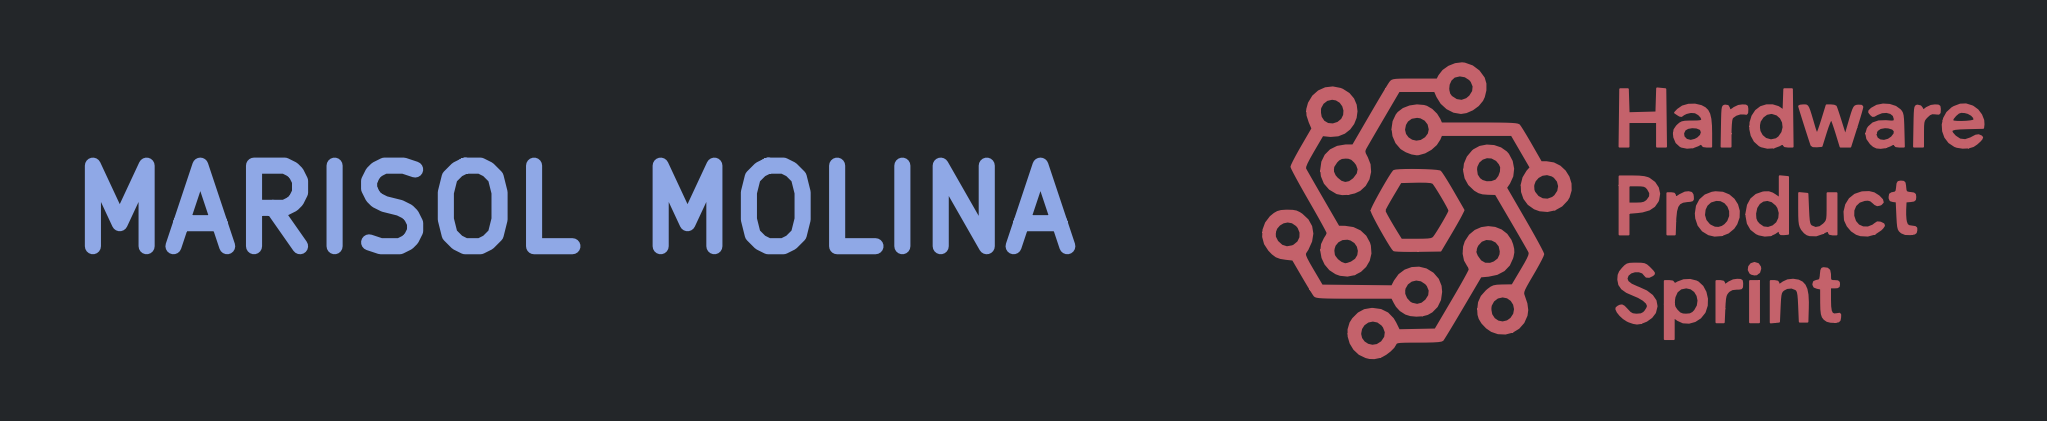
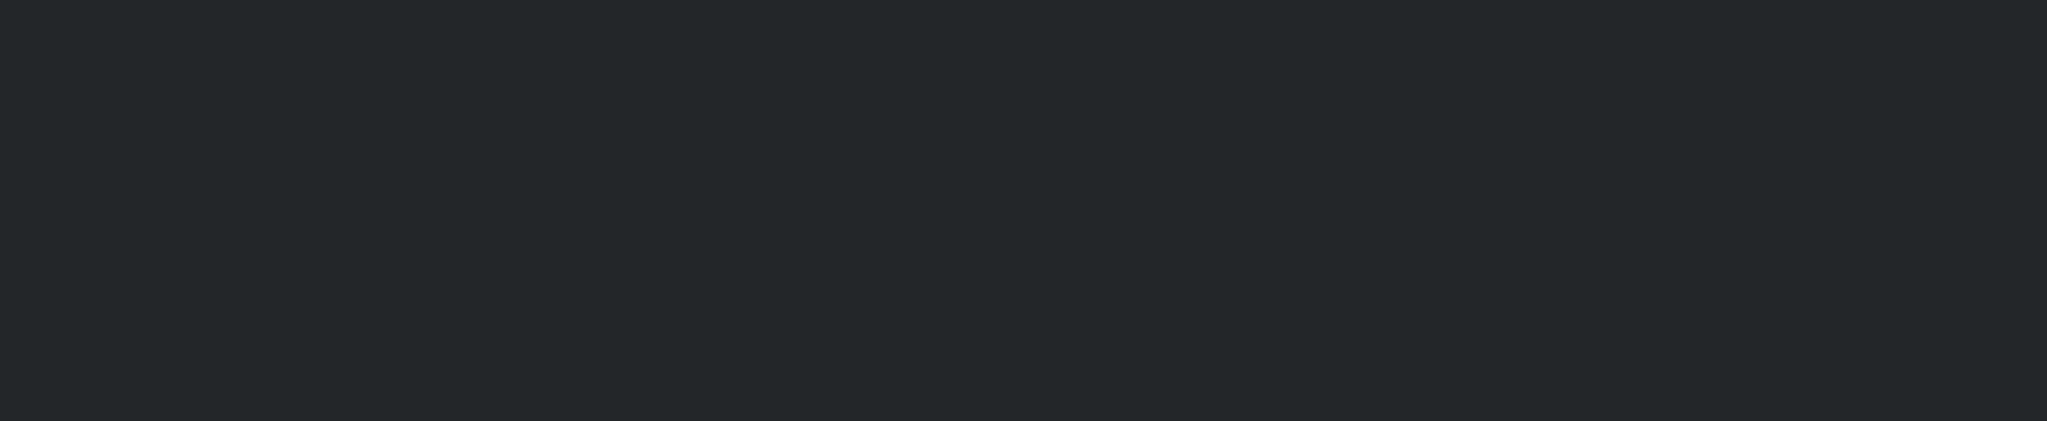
drawing: [1262, 63, 1984, 359] -> none
text: MARISOL MOLINA (580, 205) -> none

